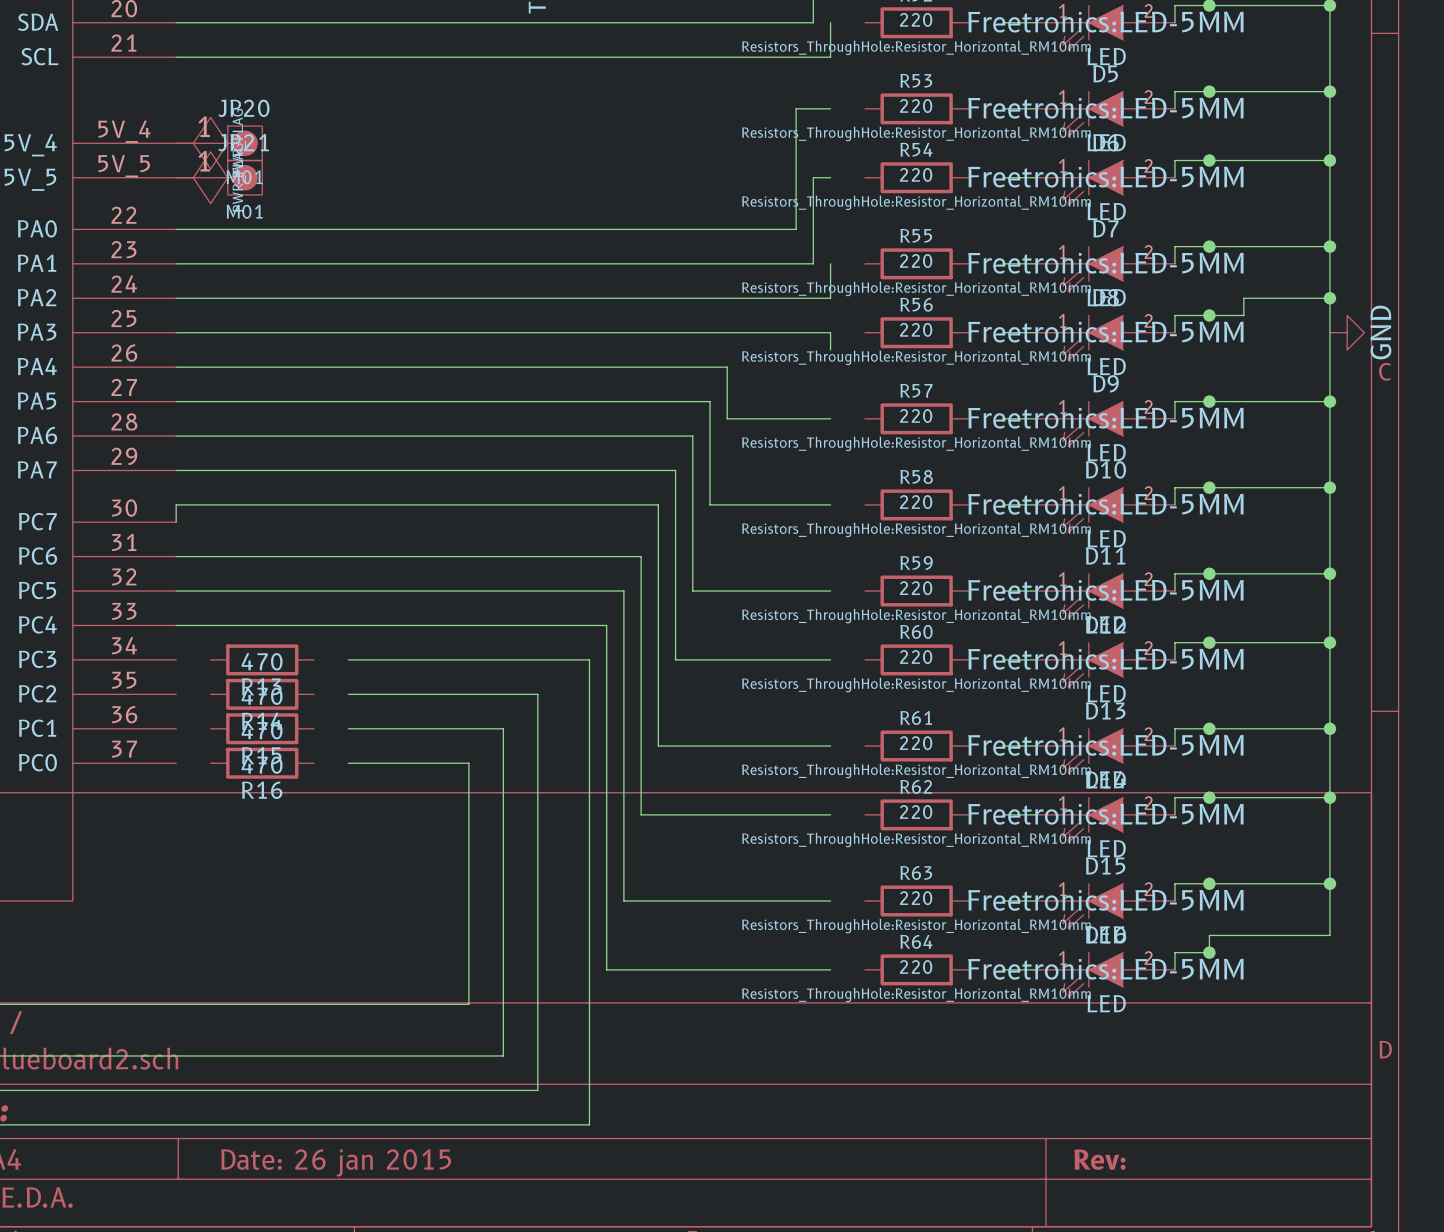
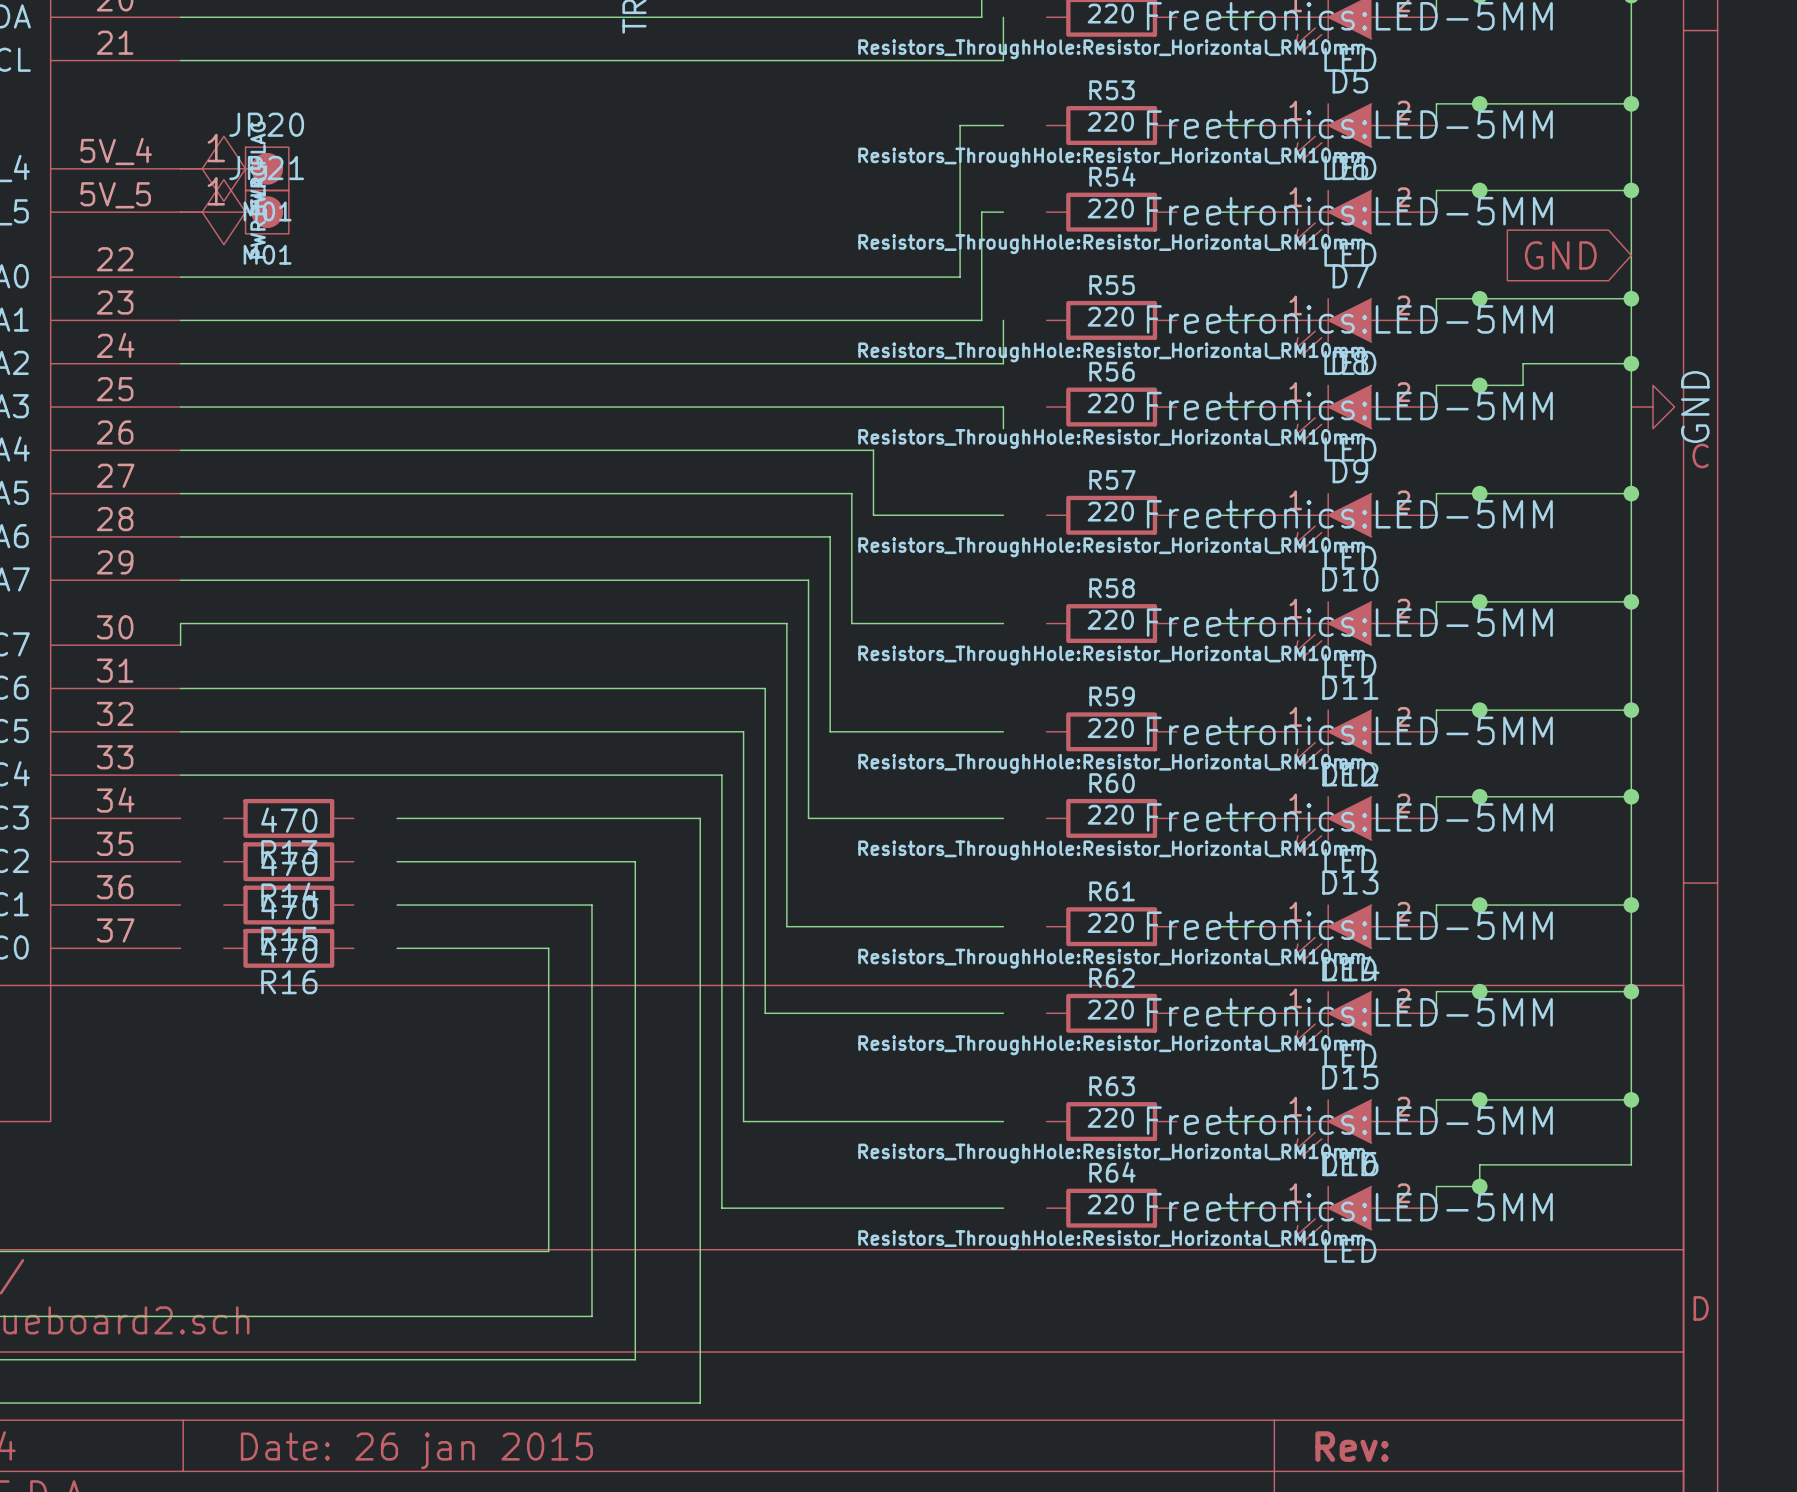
global label: none -> GND (1560, 255)

